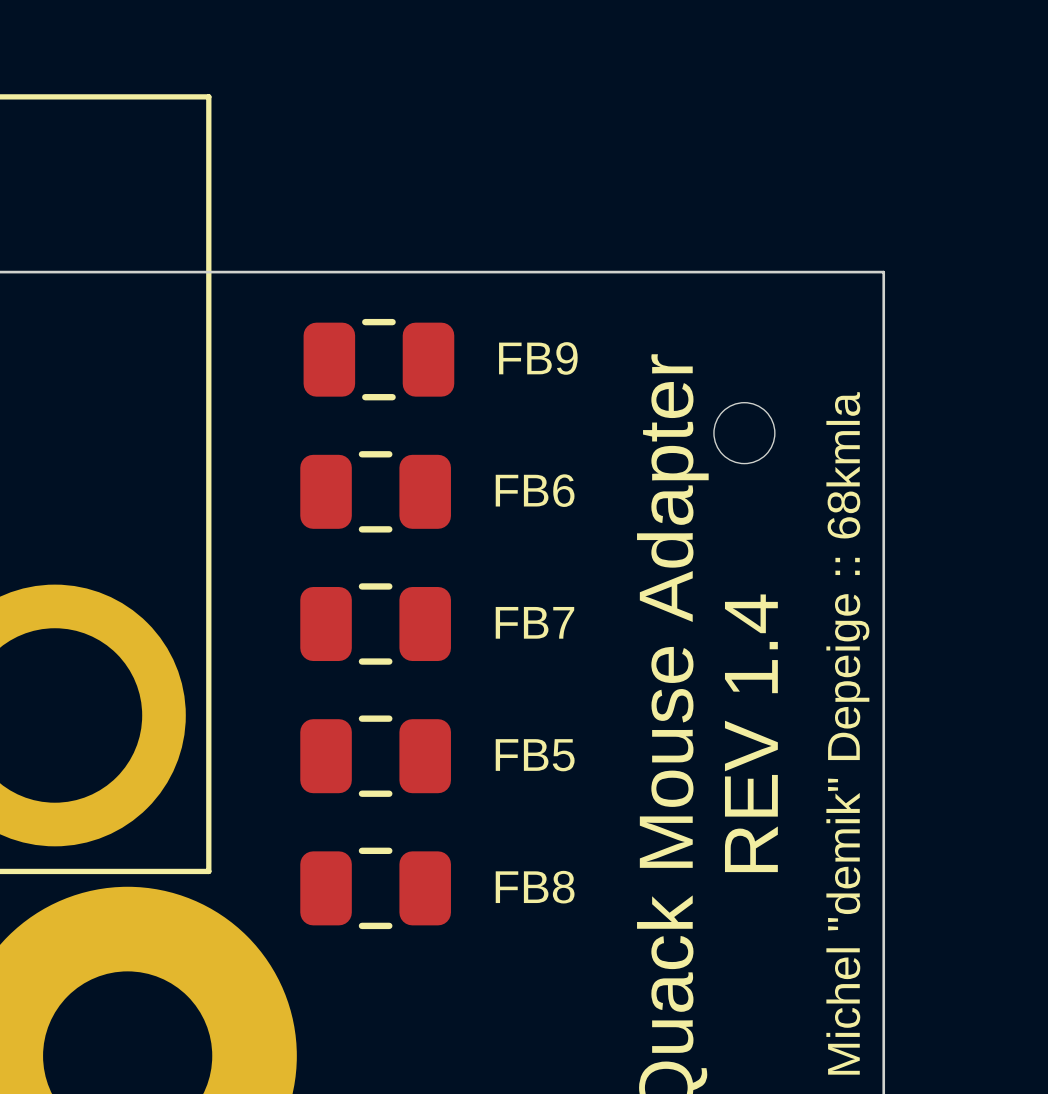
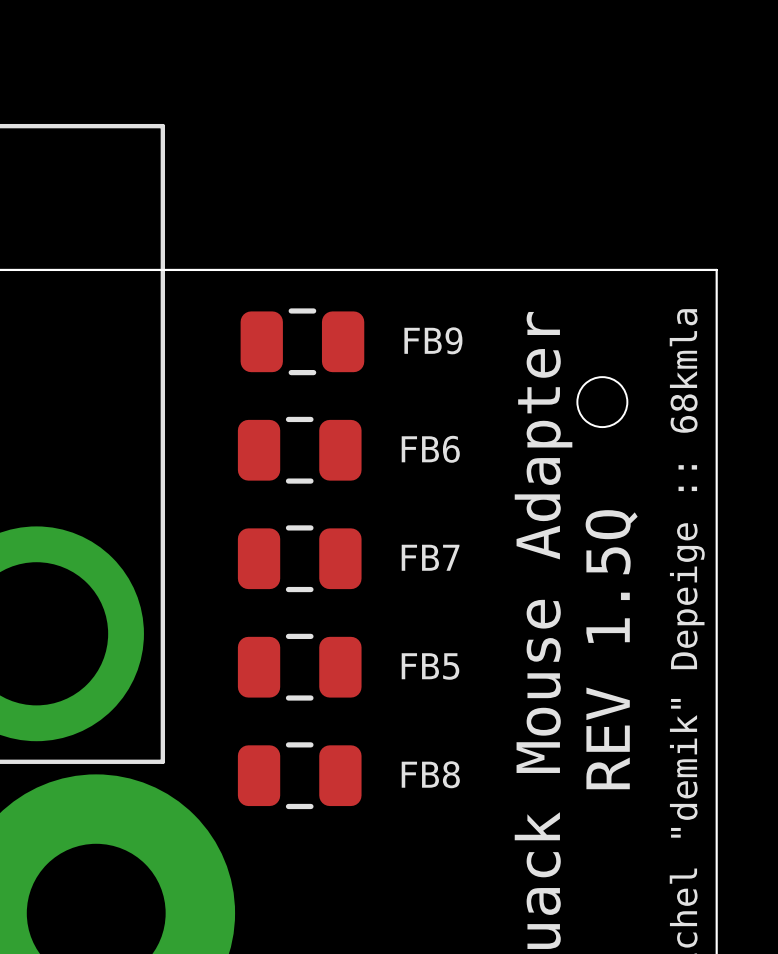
text: REV 1.4 (751, 733) -> REV 1.5Q (611, 649)

